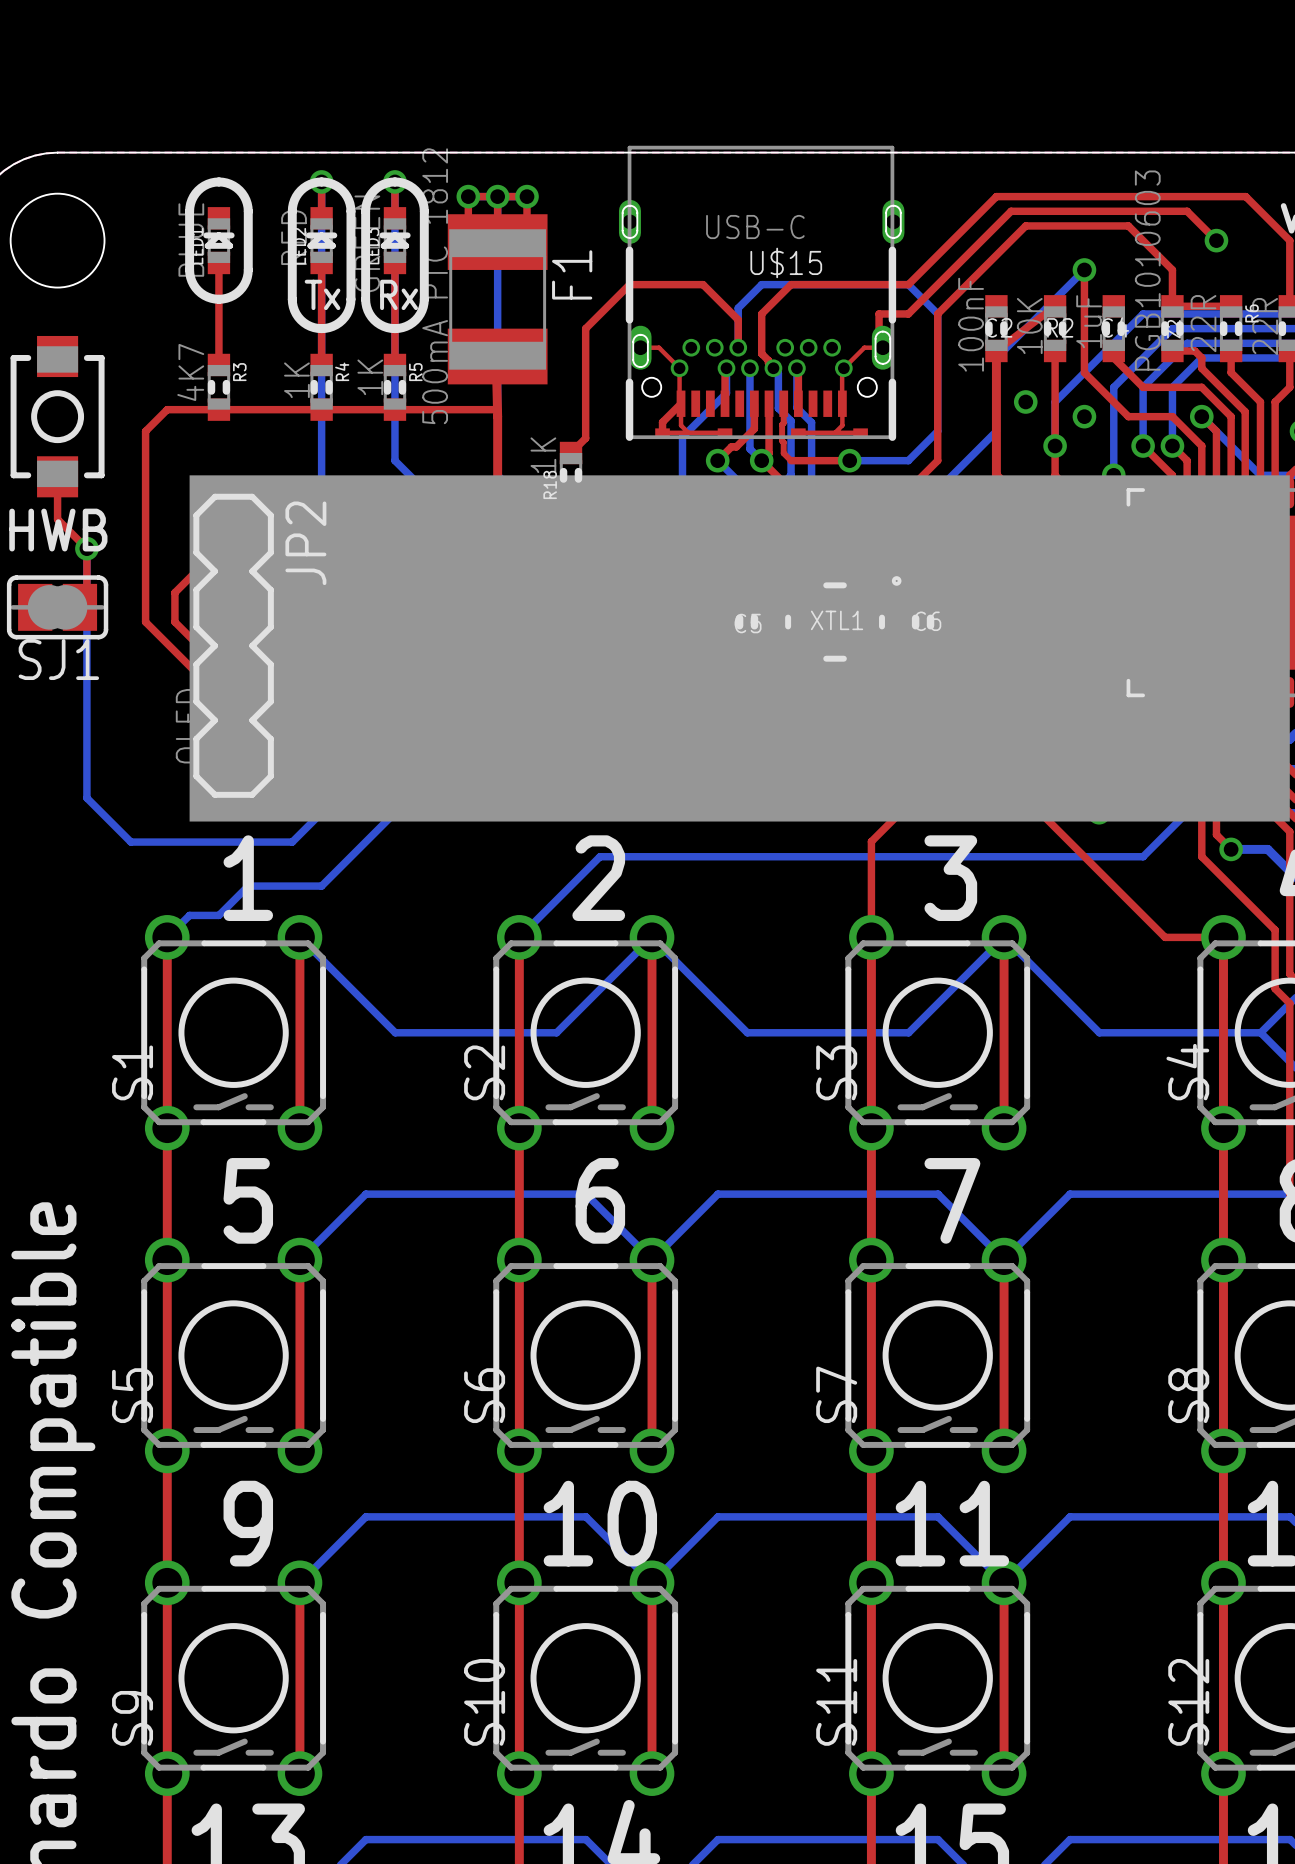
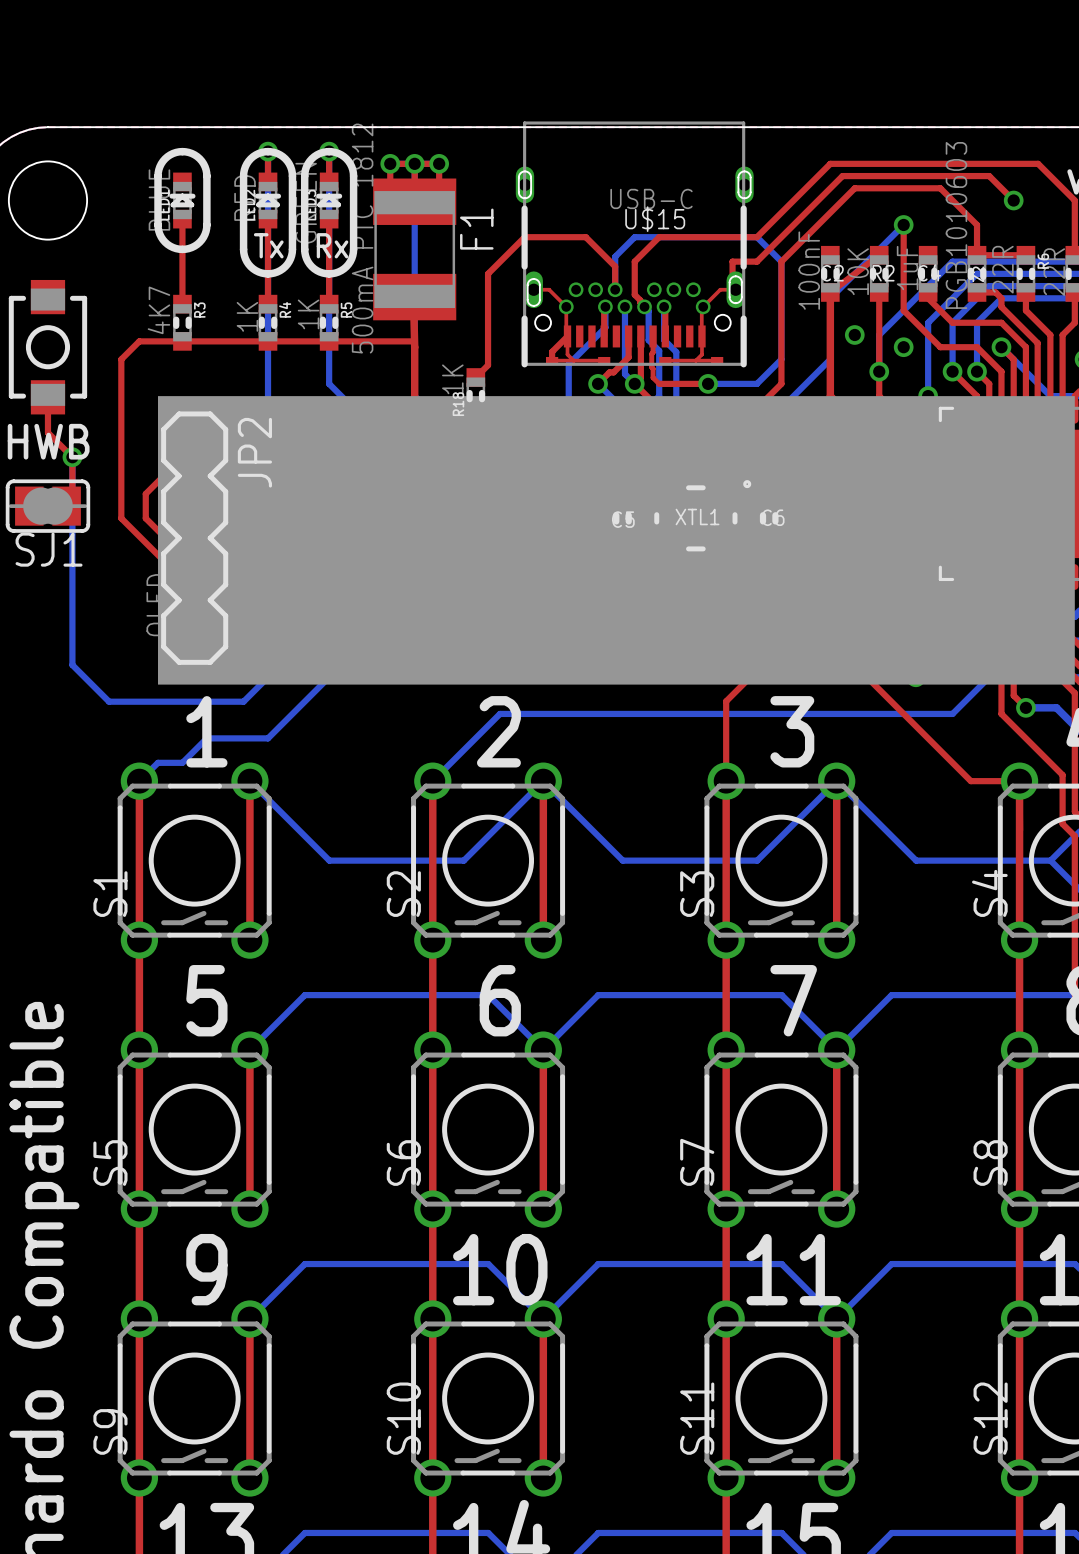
U$15 value position: USB-C (755, 227) -> USB-C (651, 198)

